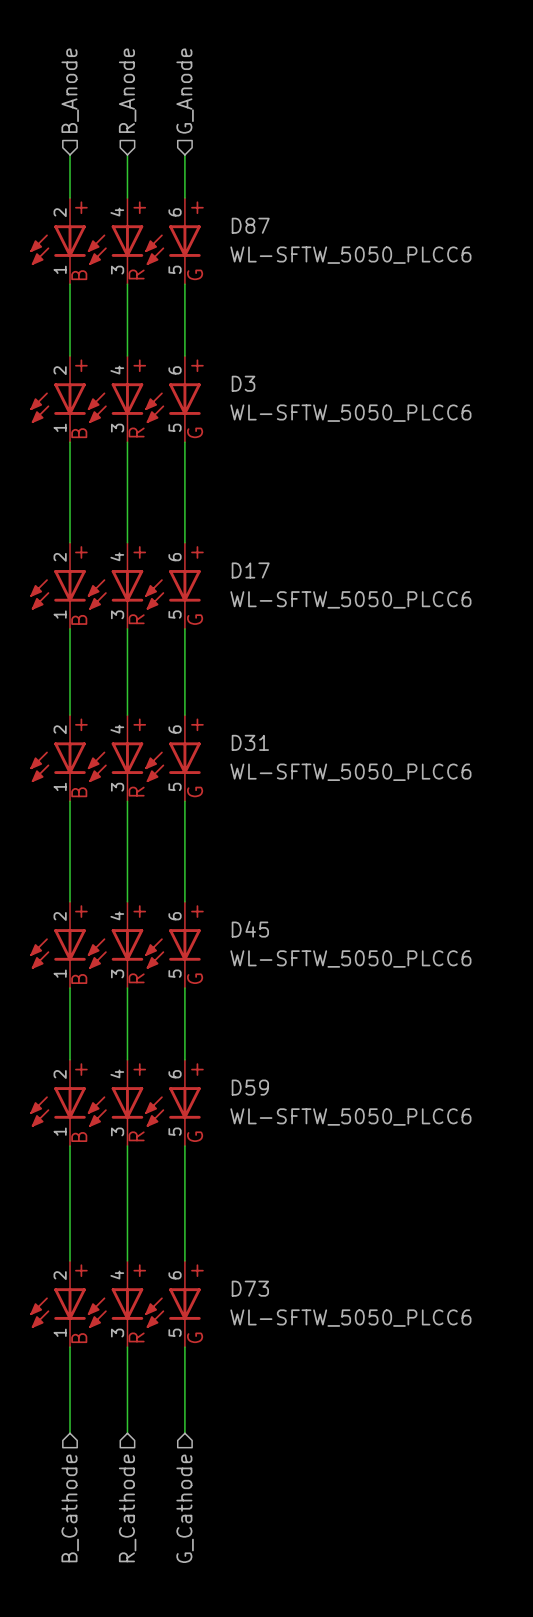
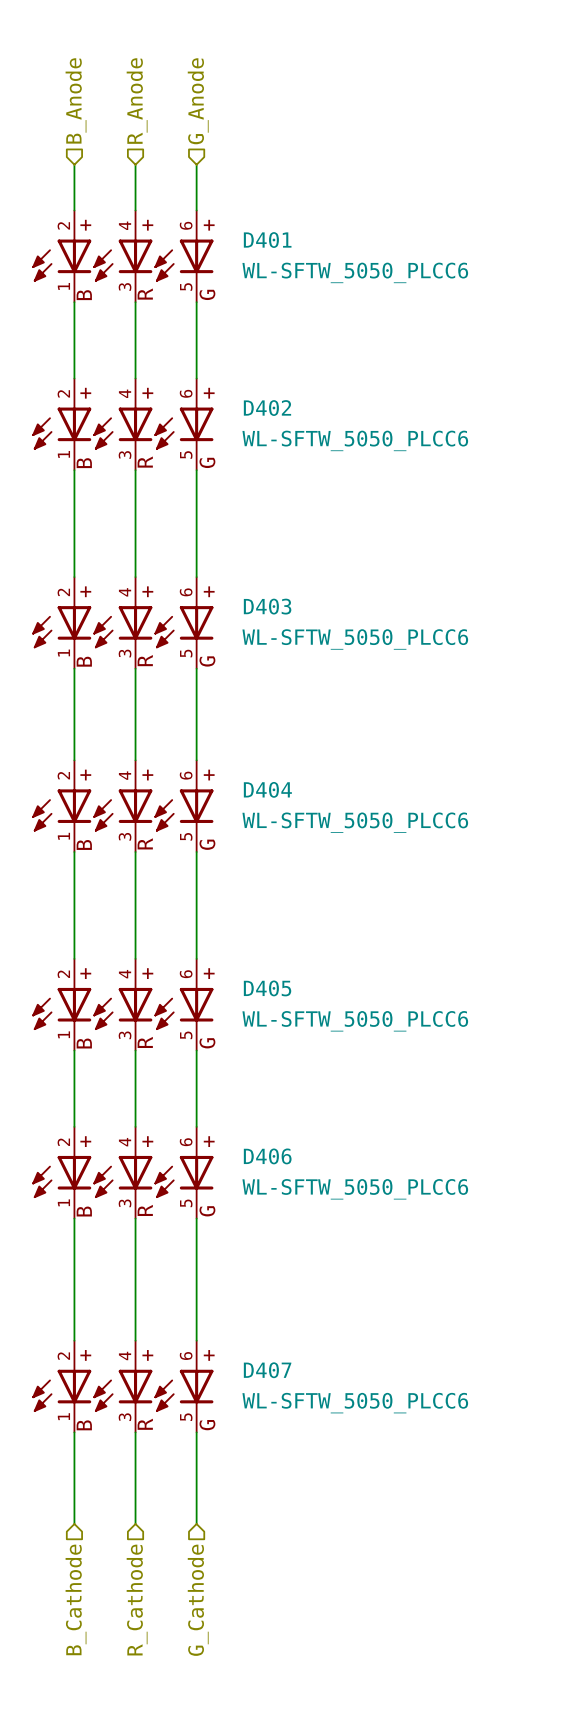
D87 name: D87 (250, 225) -> D401 (267, 240)
D3 name: D3 (243, 383) -> D402 (267, 408)
D17 name: D17 (250, 570) -> D403 (267, 606)
D31 name: D31 (250, 742) -> D404 (267, 789)
D45 name: D45 (250, 929) -> D405 (267, 988)
D59 name: D59 (250, 1087) -> D406 (267, 1156)
D73 name: D73 (250, 1288) -> D407 (267, 1370)

